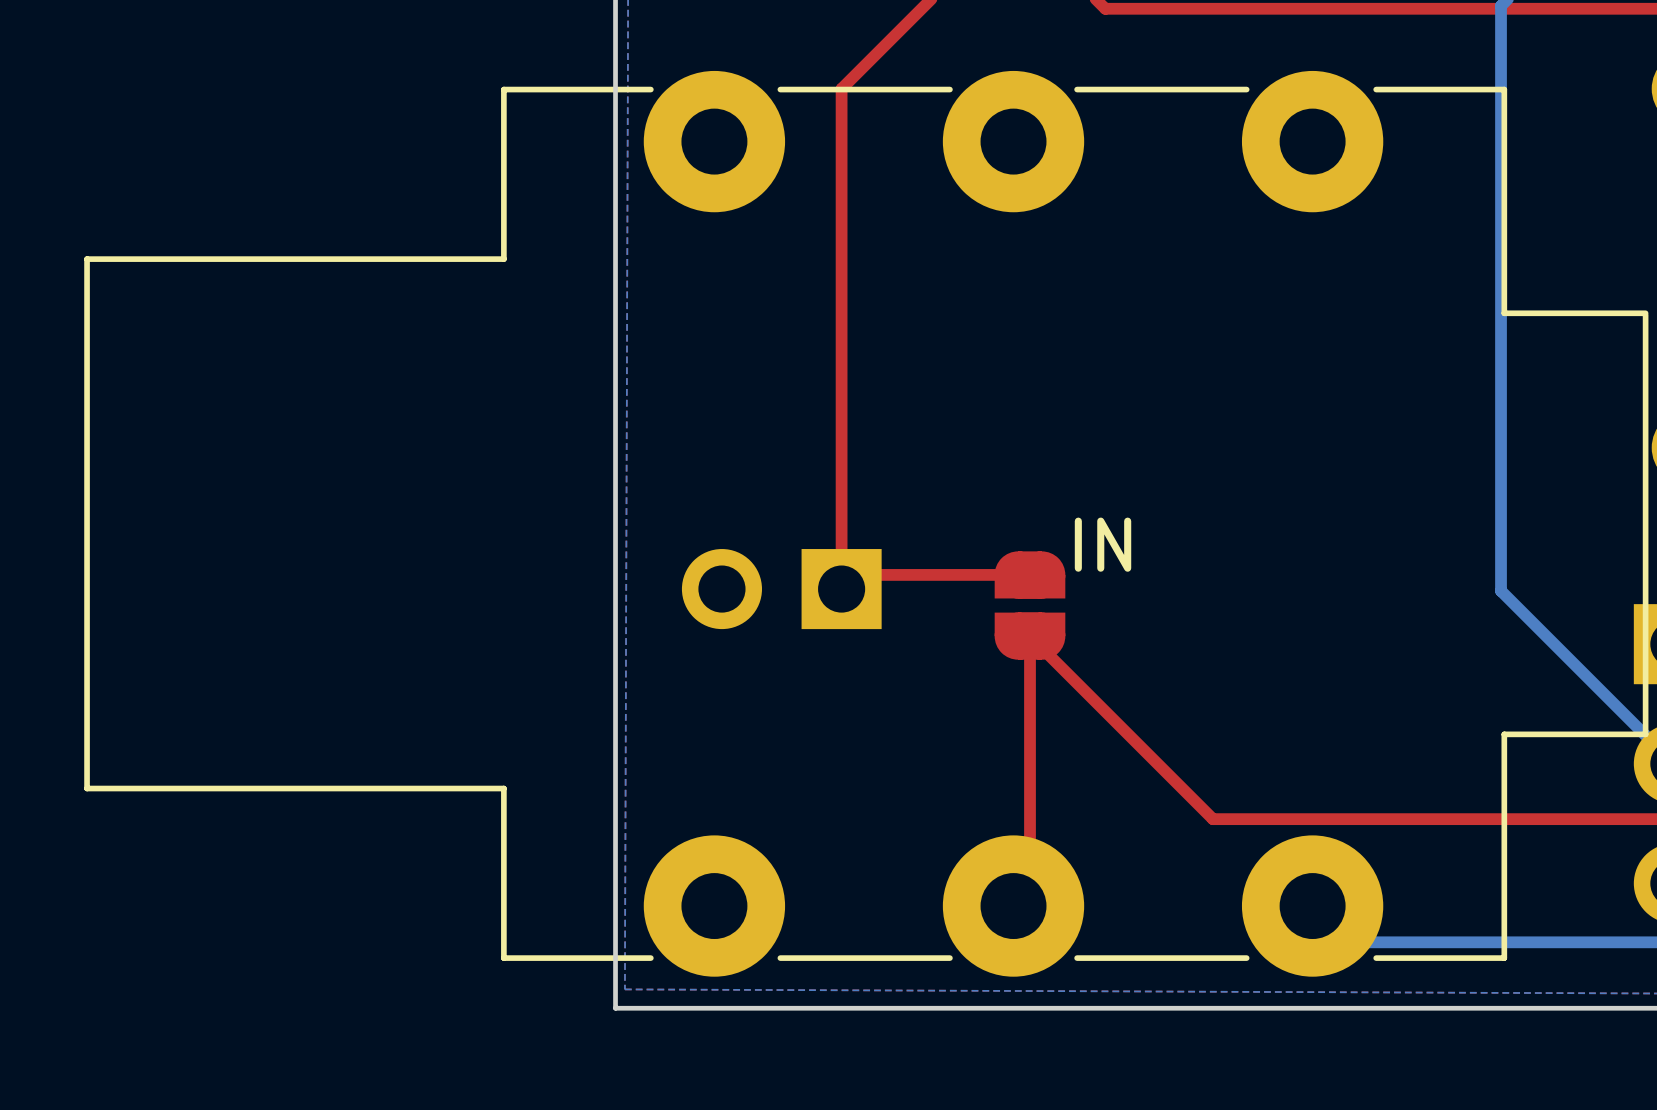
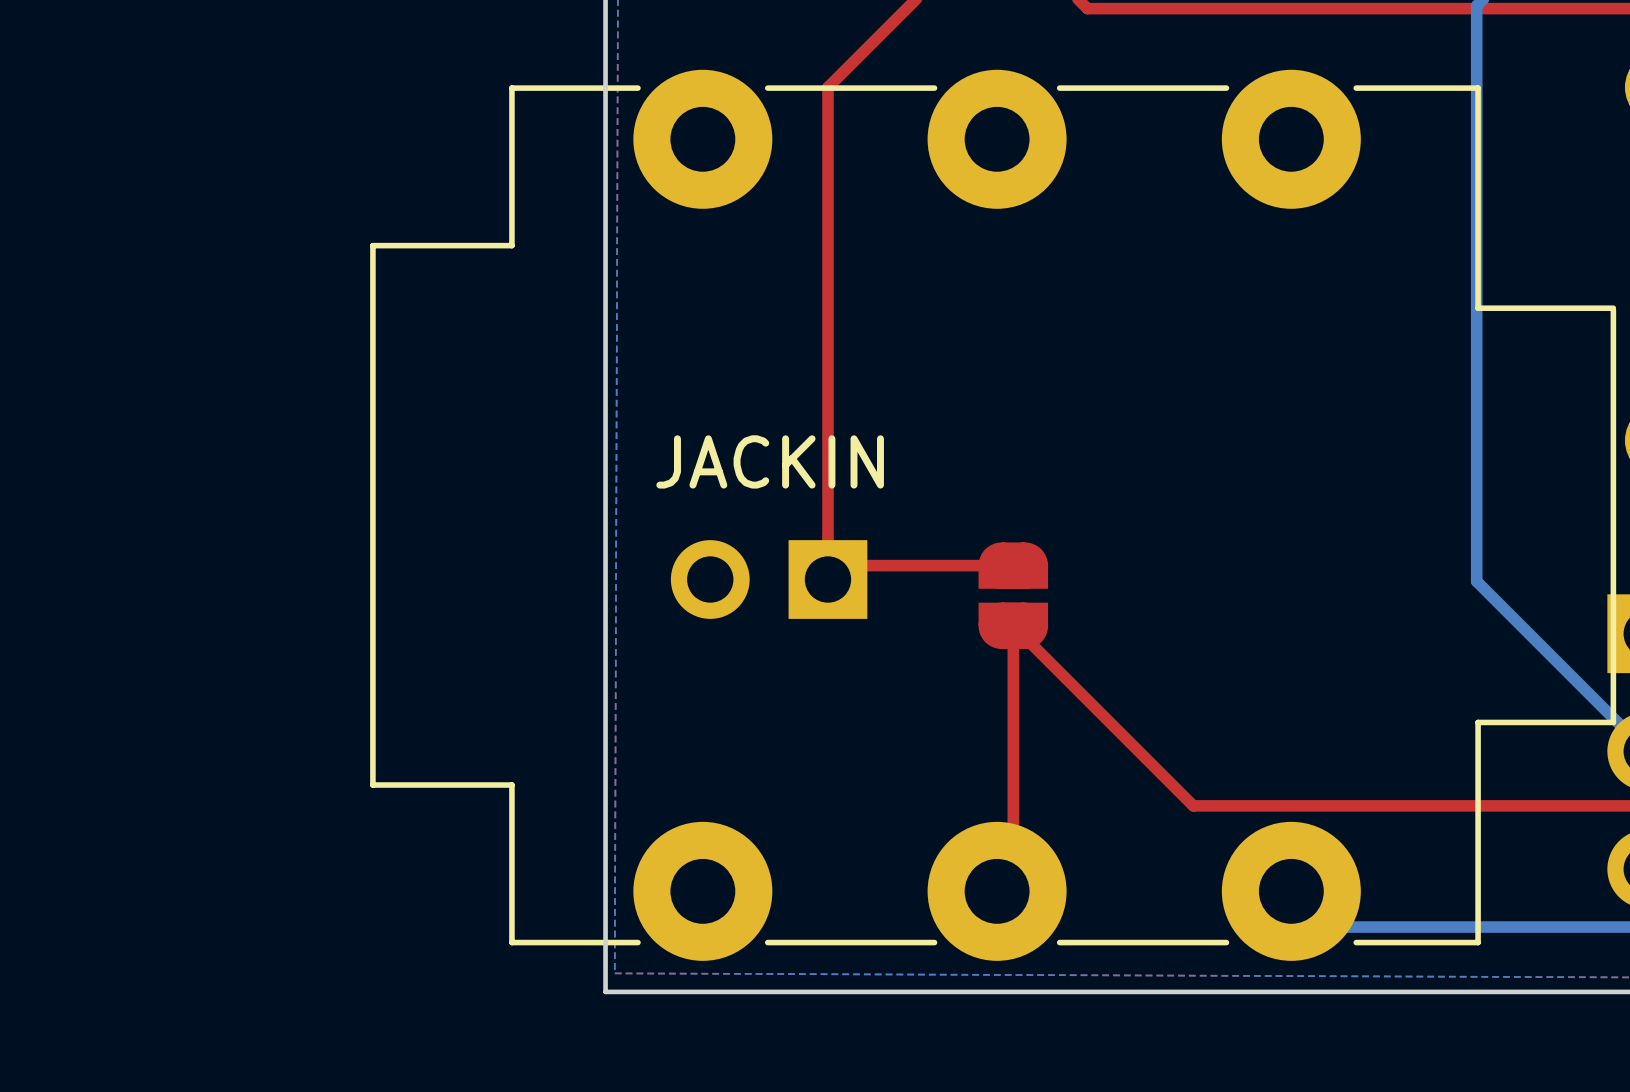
part: IN (866, 523) -> none
part: none -> JACKIN (993, 515)

